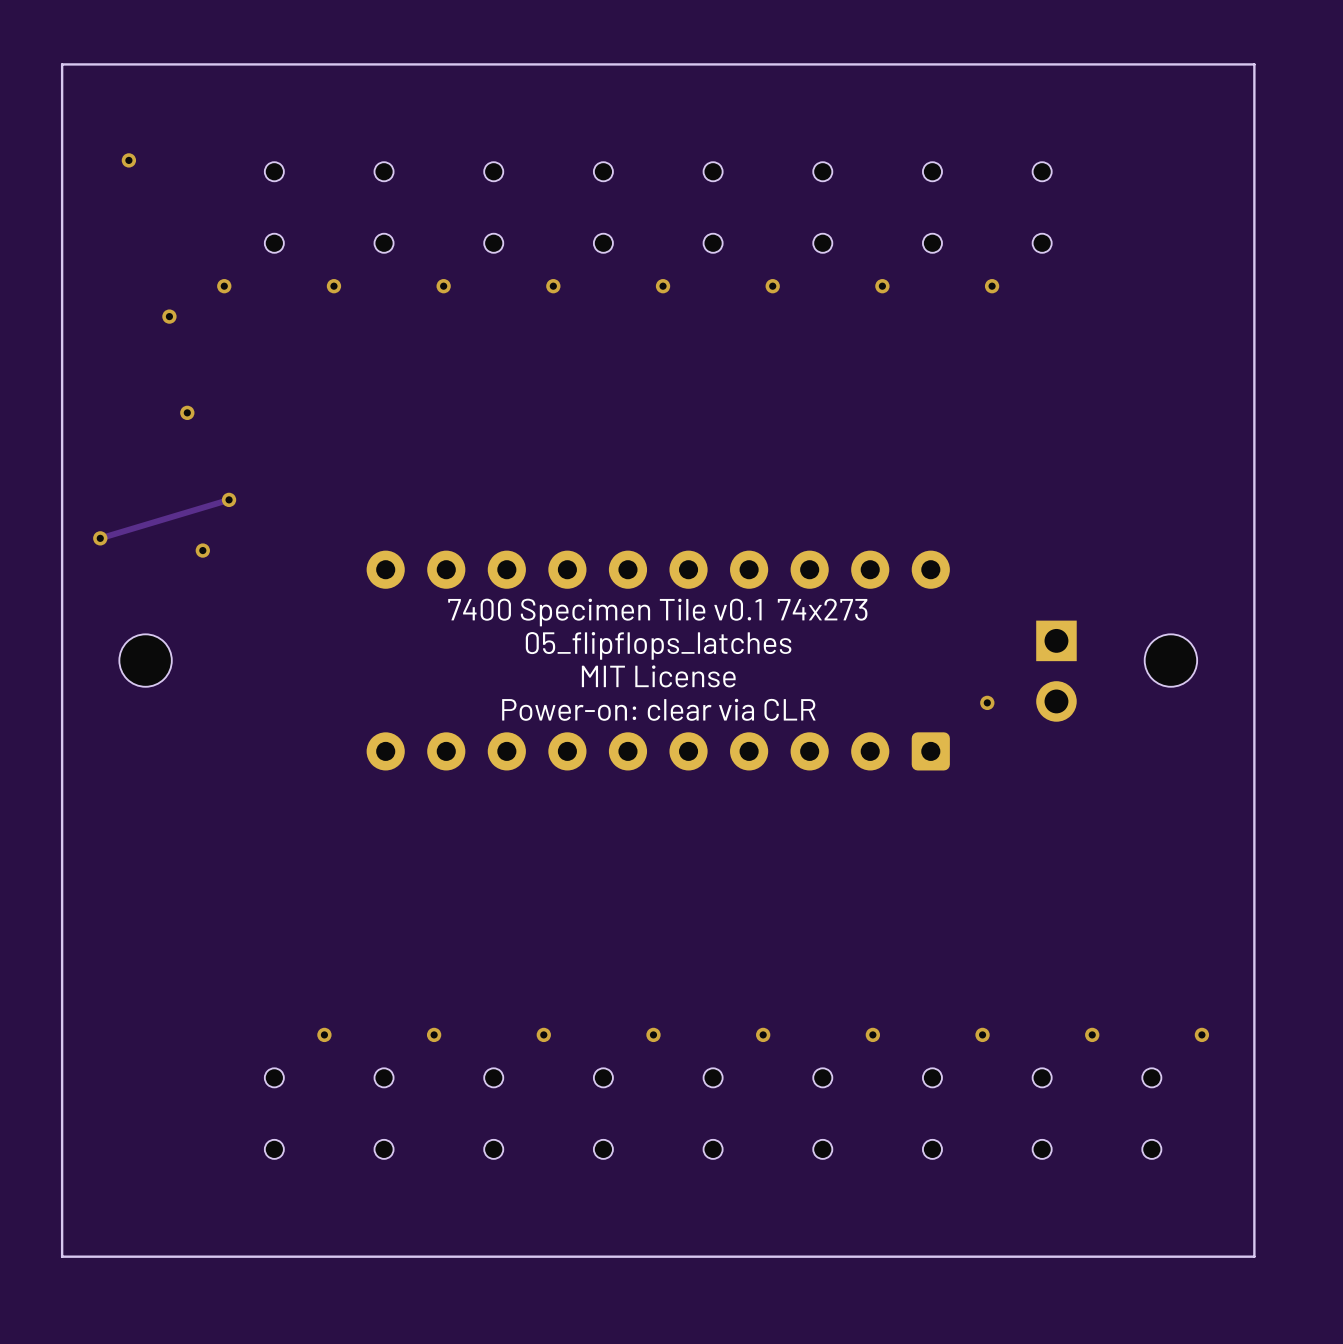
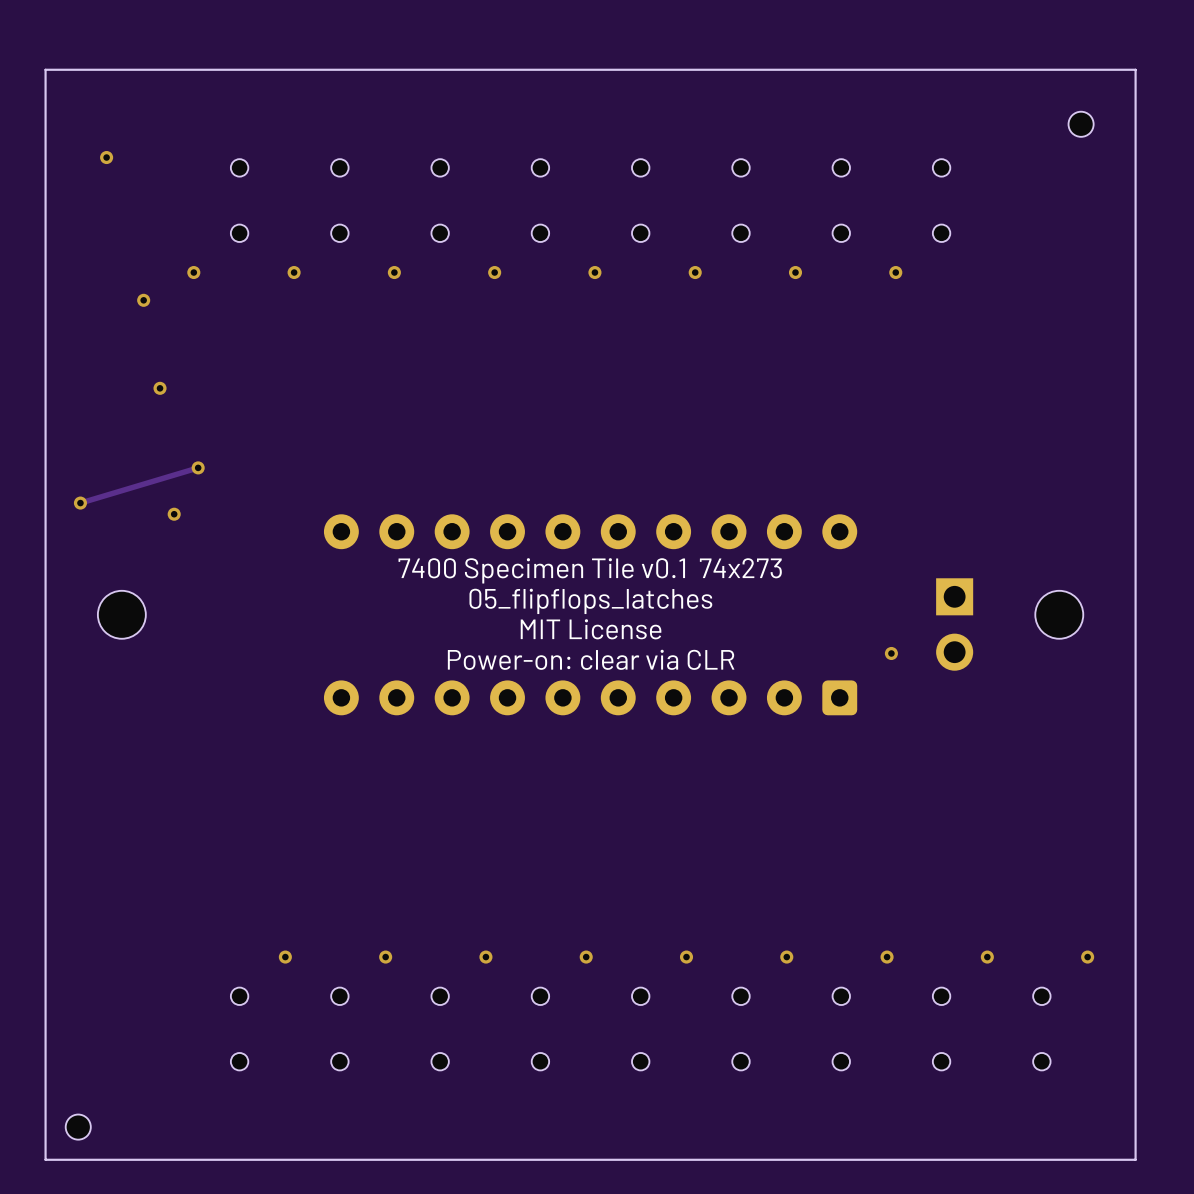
part: none -> (1081, 124)
part: none -> (78, 1127)

